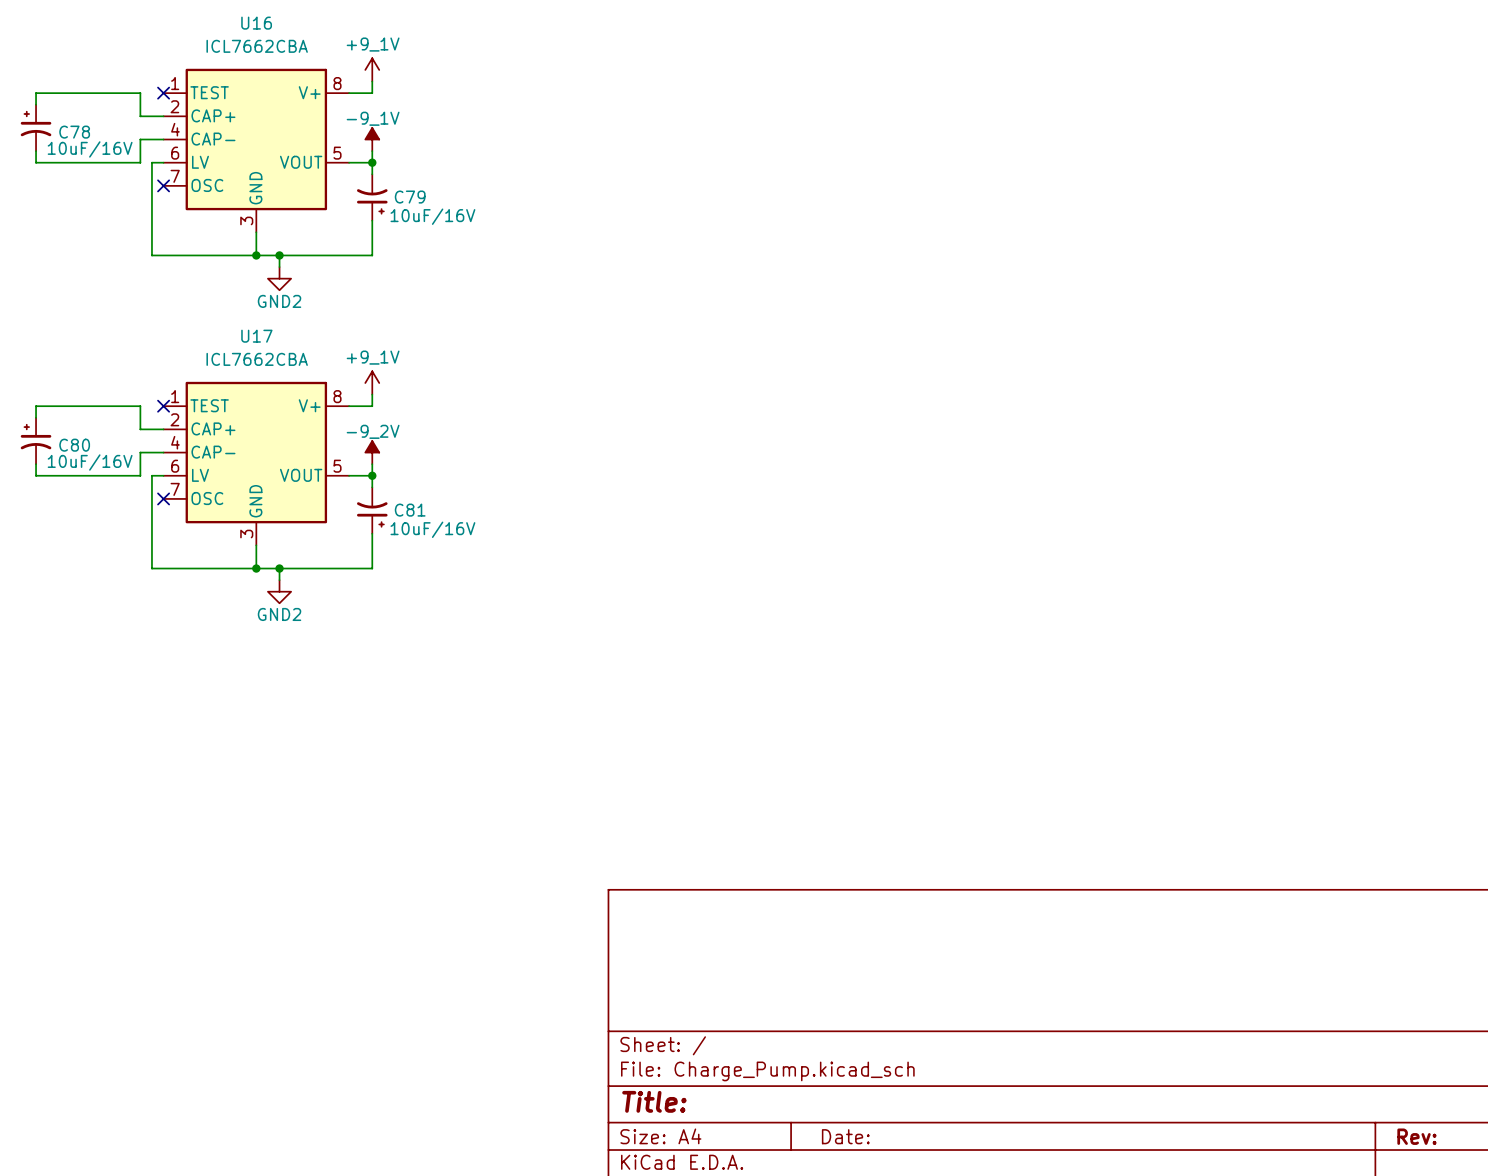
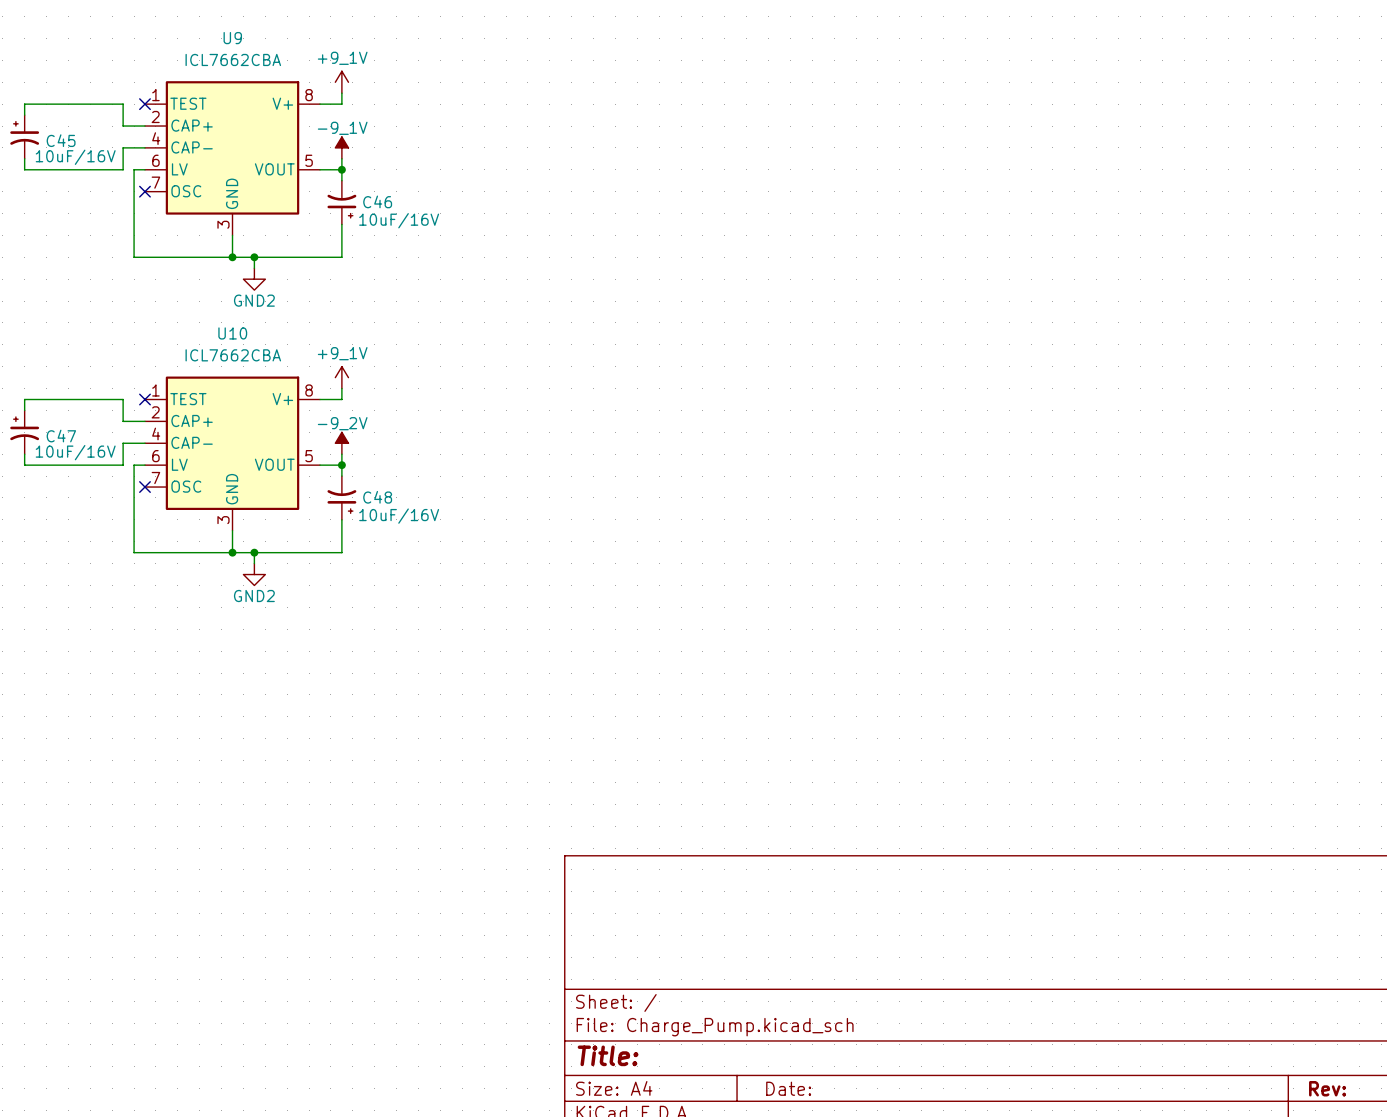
U16 name: U16 (256, 23) -> U9 (232, 38)
C78 name: C78 (74, 132) -> C45 (61, 140)
C79 name: C79 (410, 197) -> C46 (377, 201)
U17 name: U17 (256, 336) -> U10 (232, 333)
C80 name: C80 (74, 445) -> C47 (61, 436)
C81 name: C81 (410, 510) -> C48 (377, 497)

